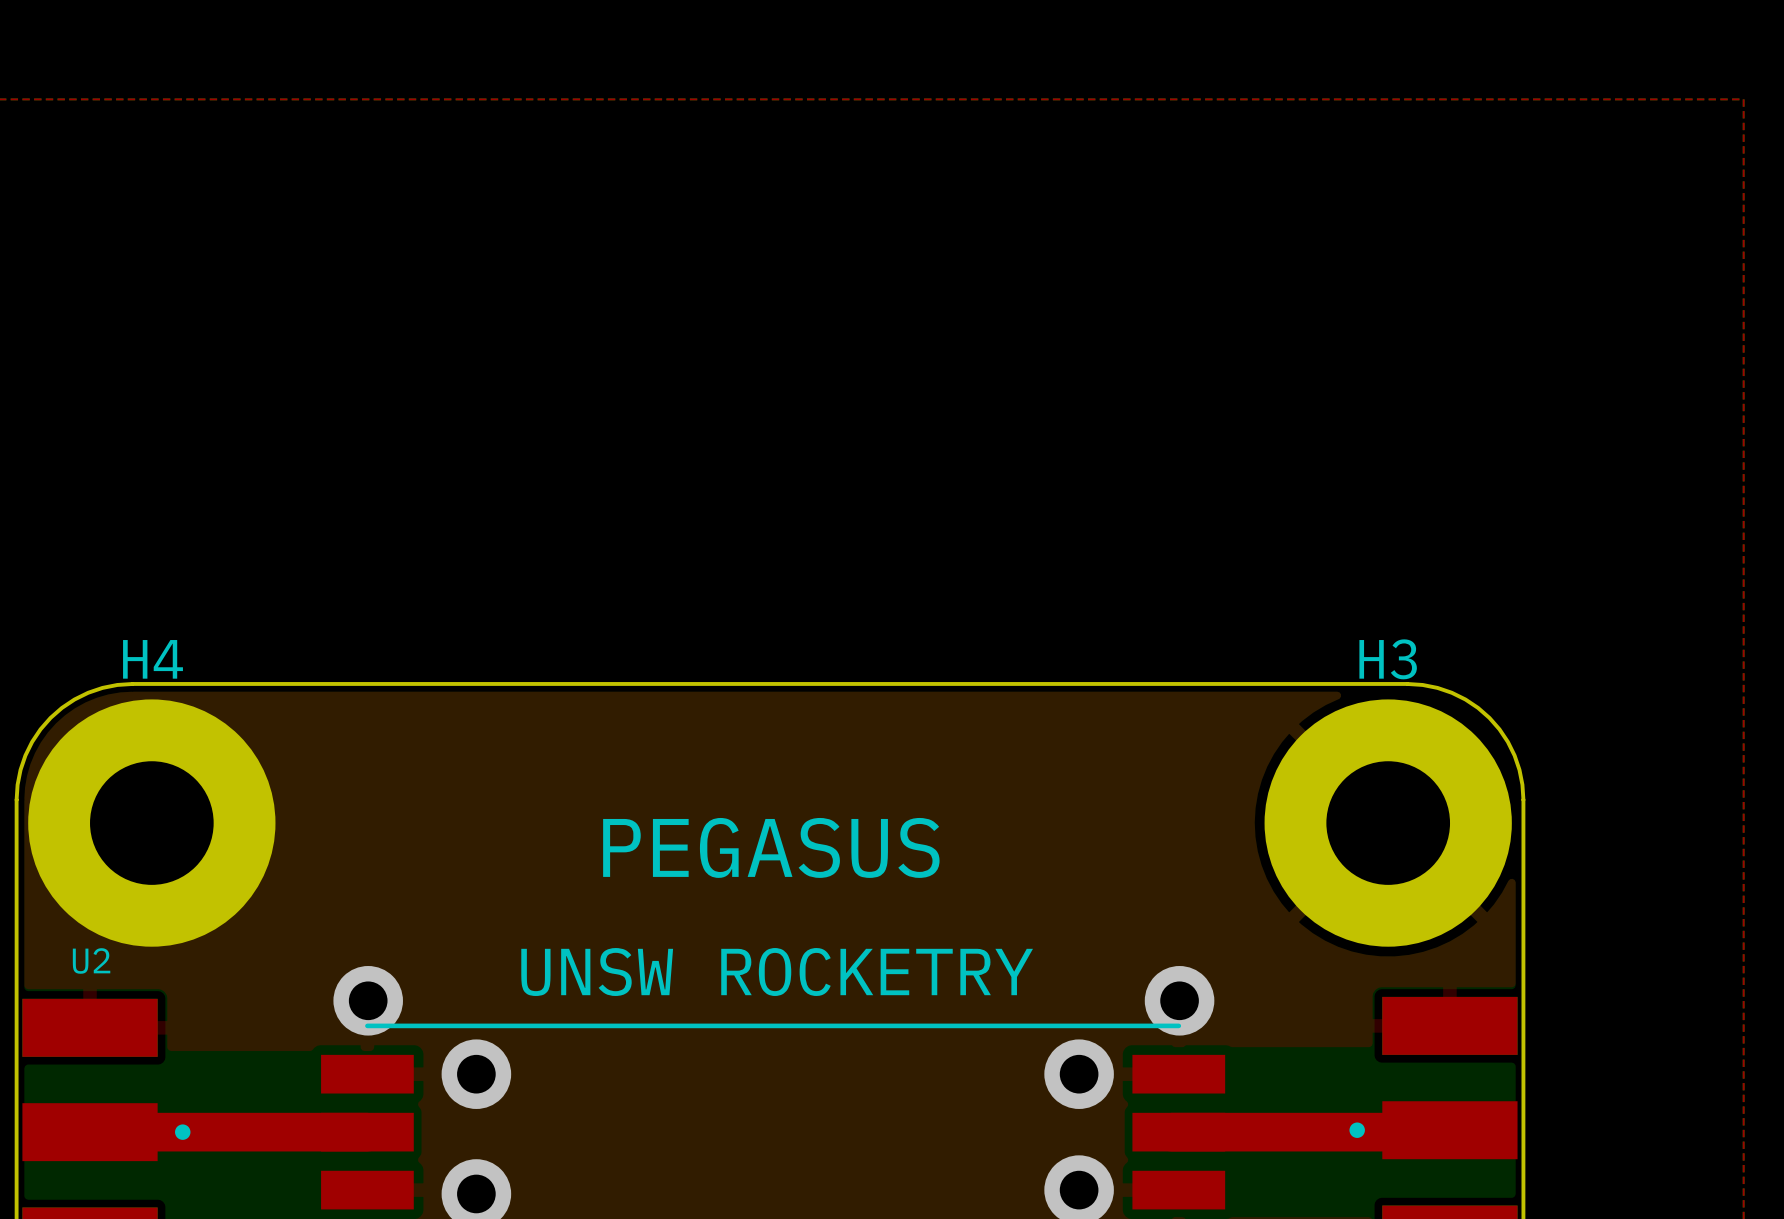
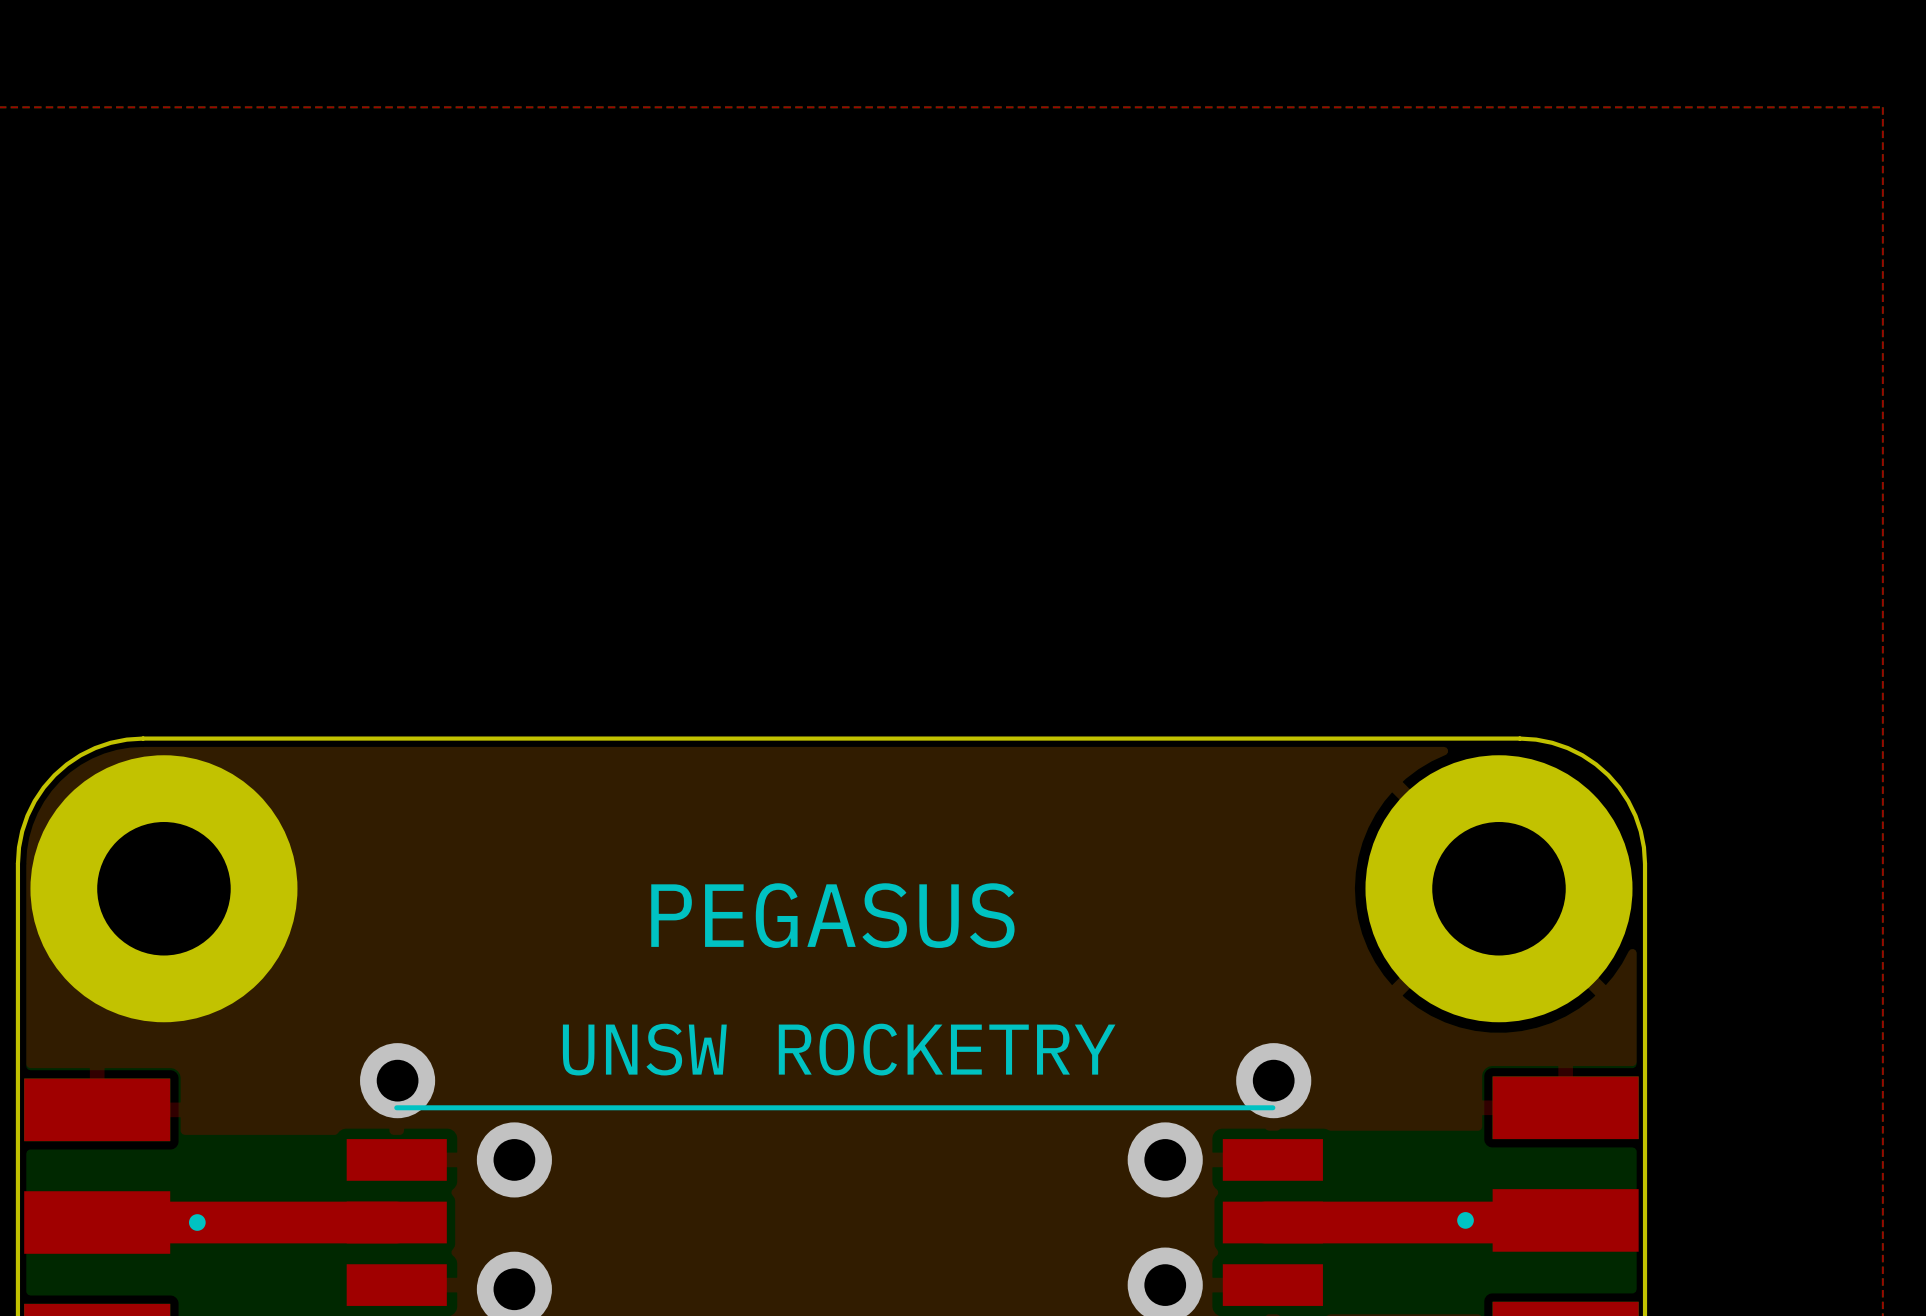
H4 name: H4 (153, 659) -> none
H3 name: H3 (1388, 659) -> none
U2 name: U2 (91, 960) -> none

